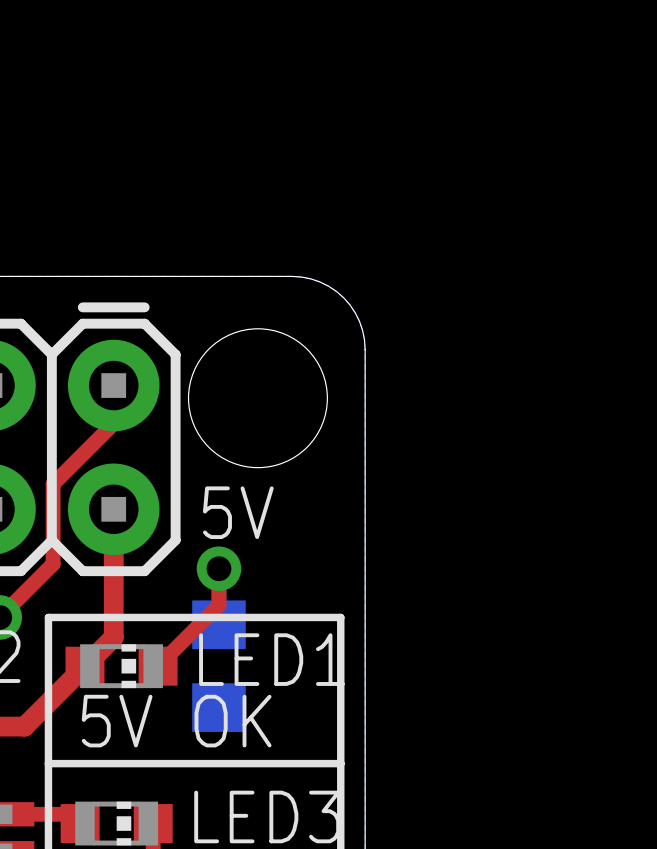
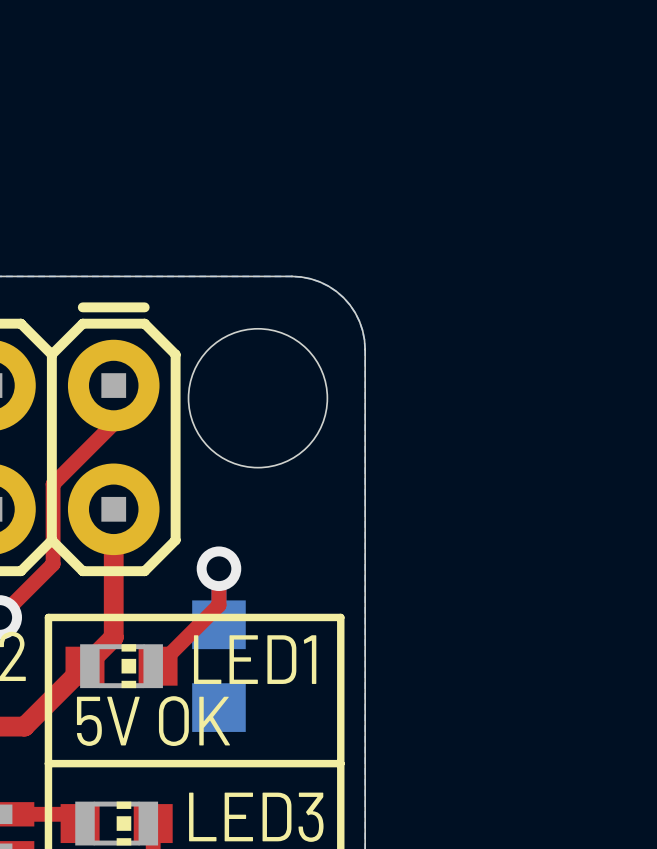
text: 5V (238, 512) -> none

